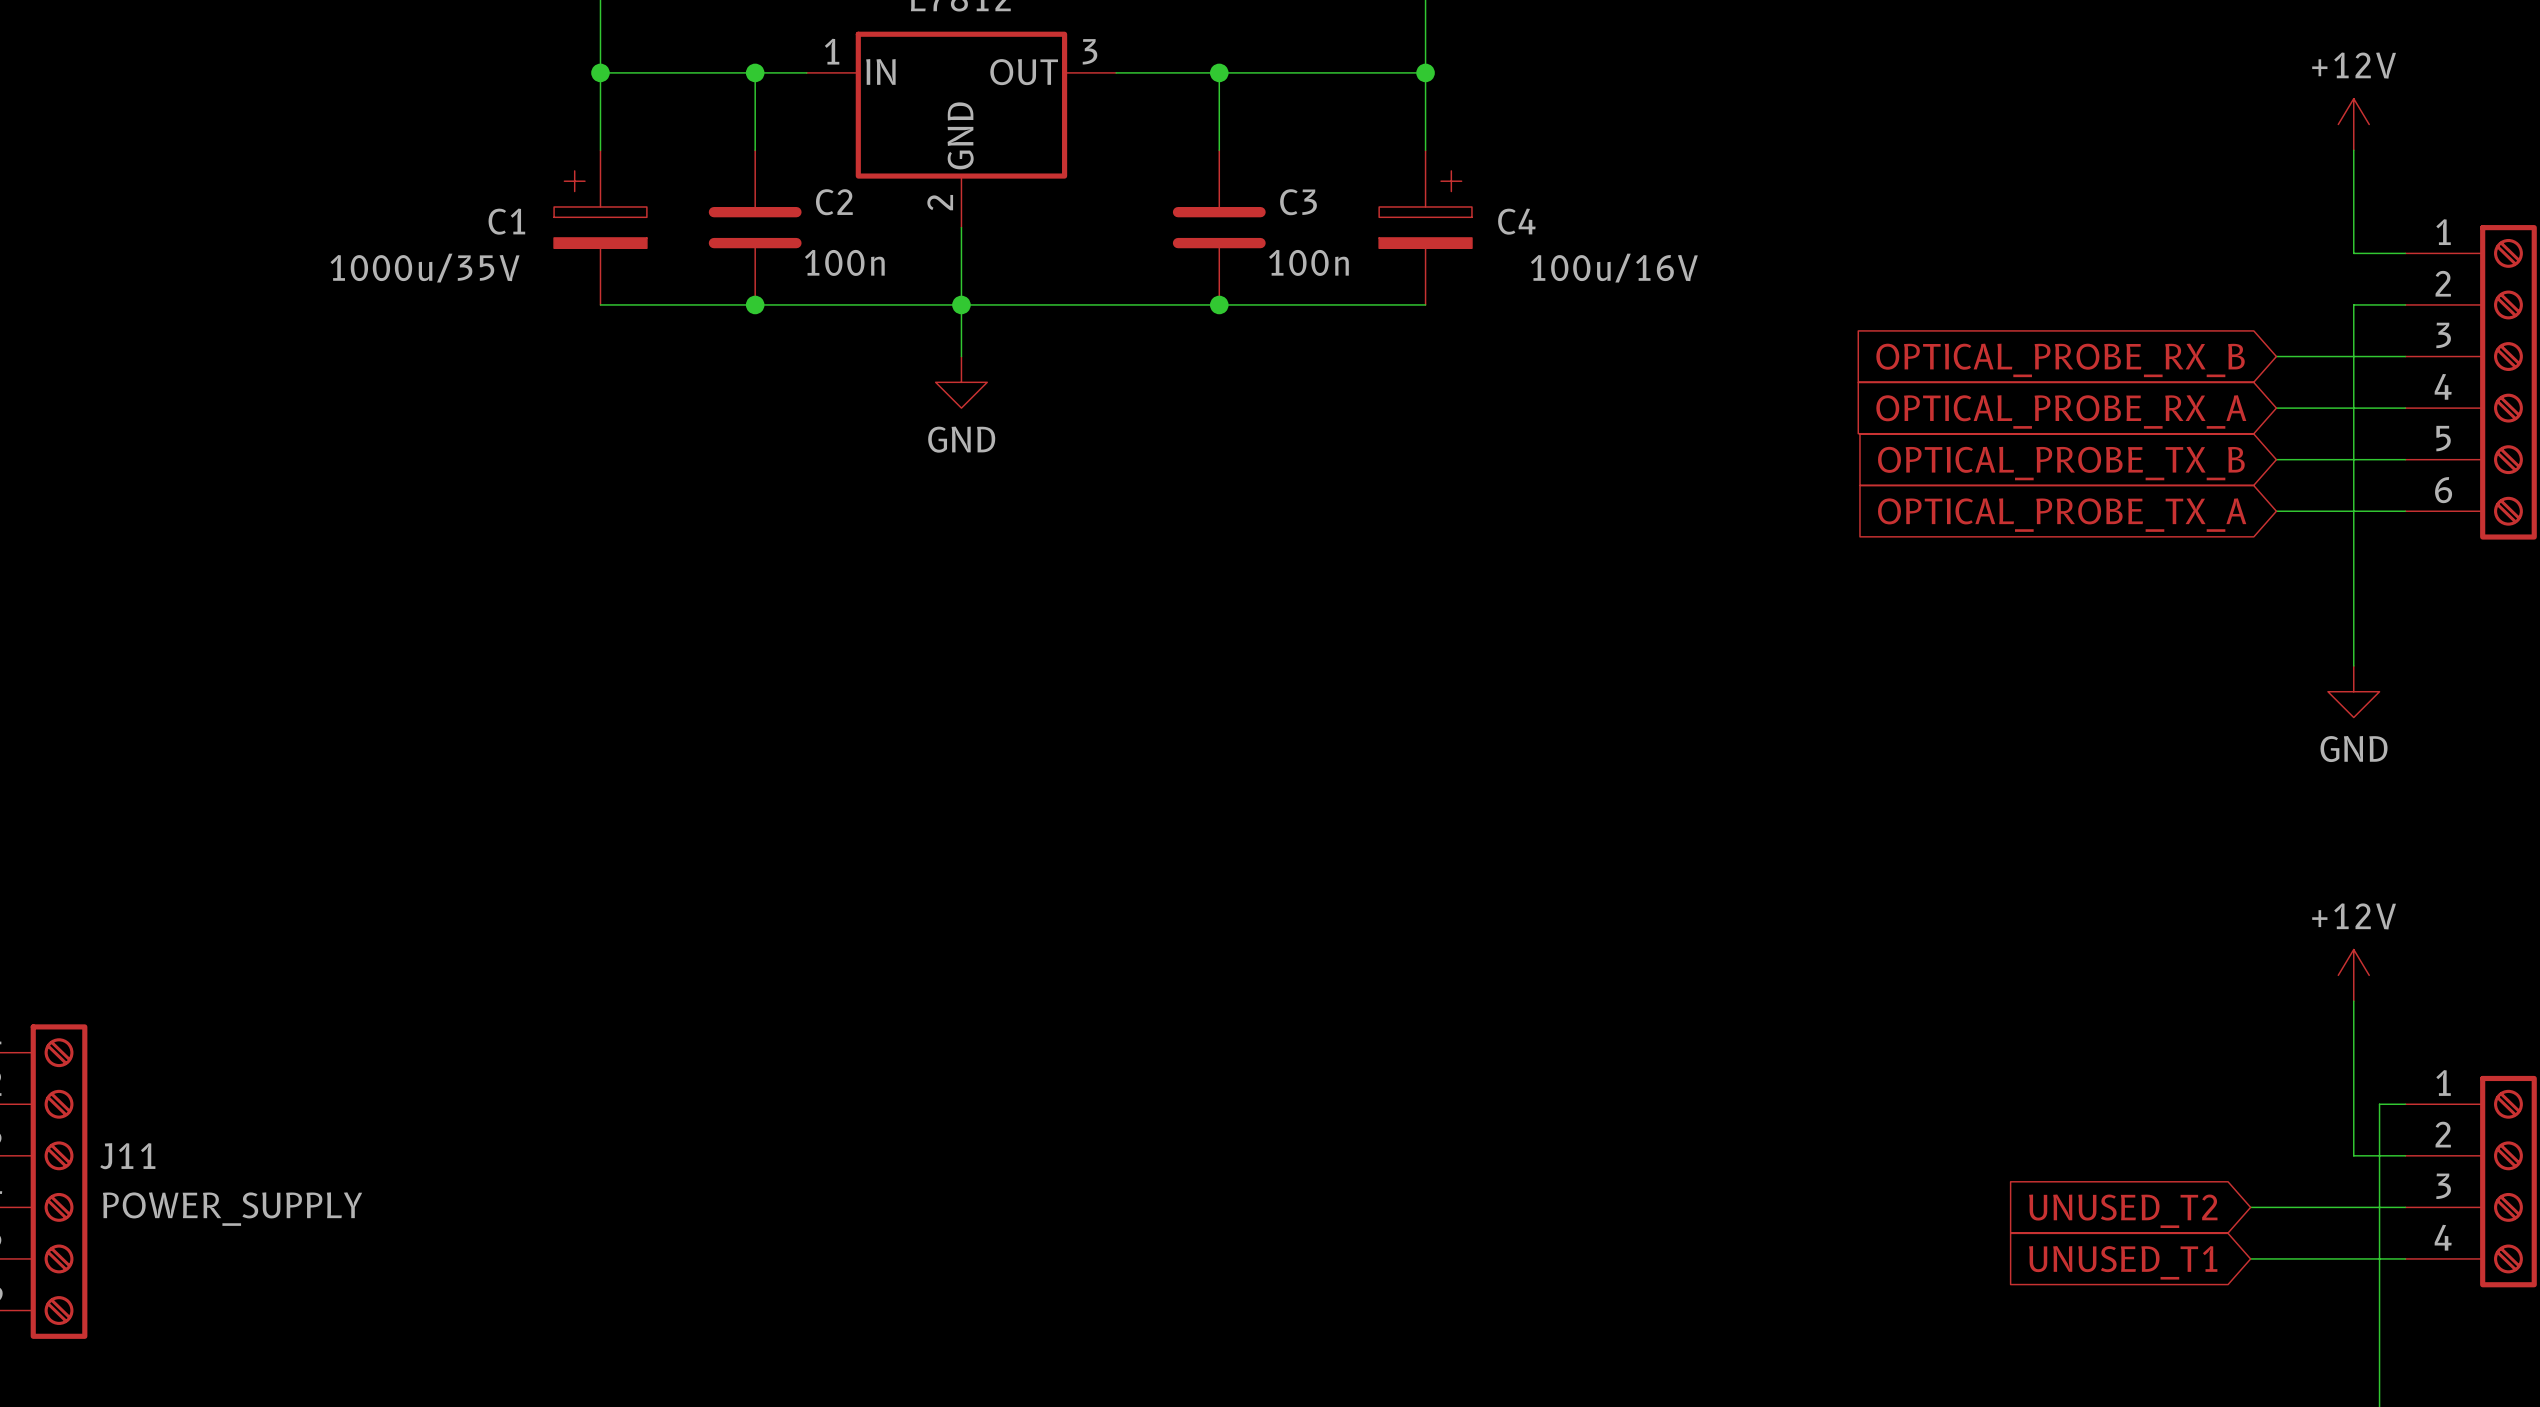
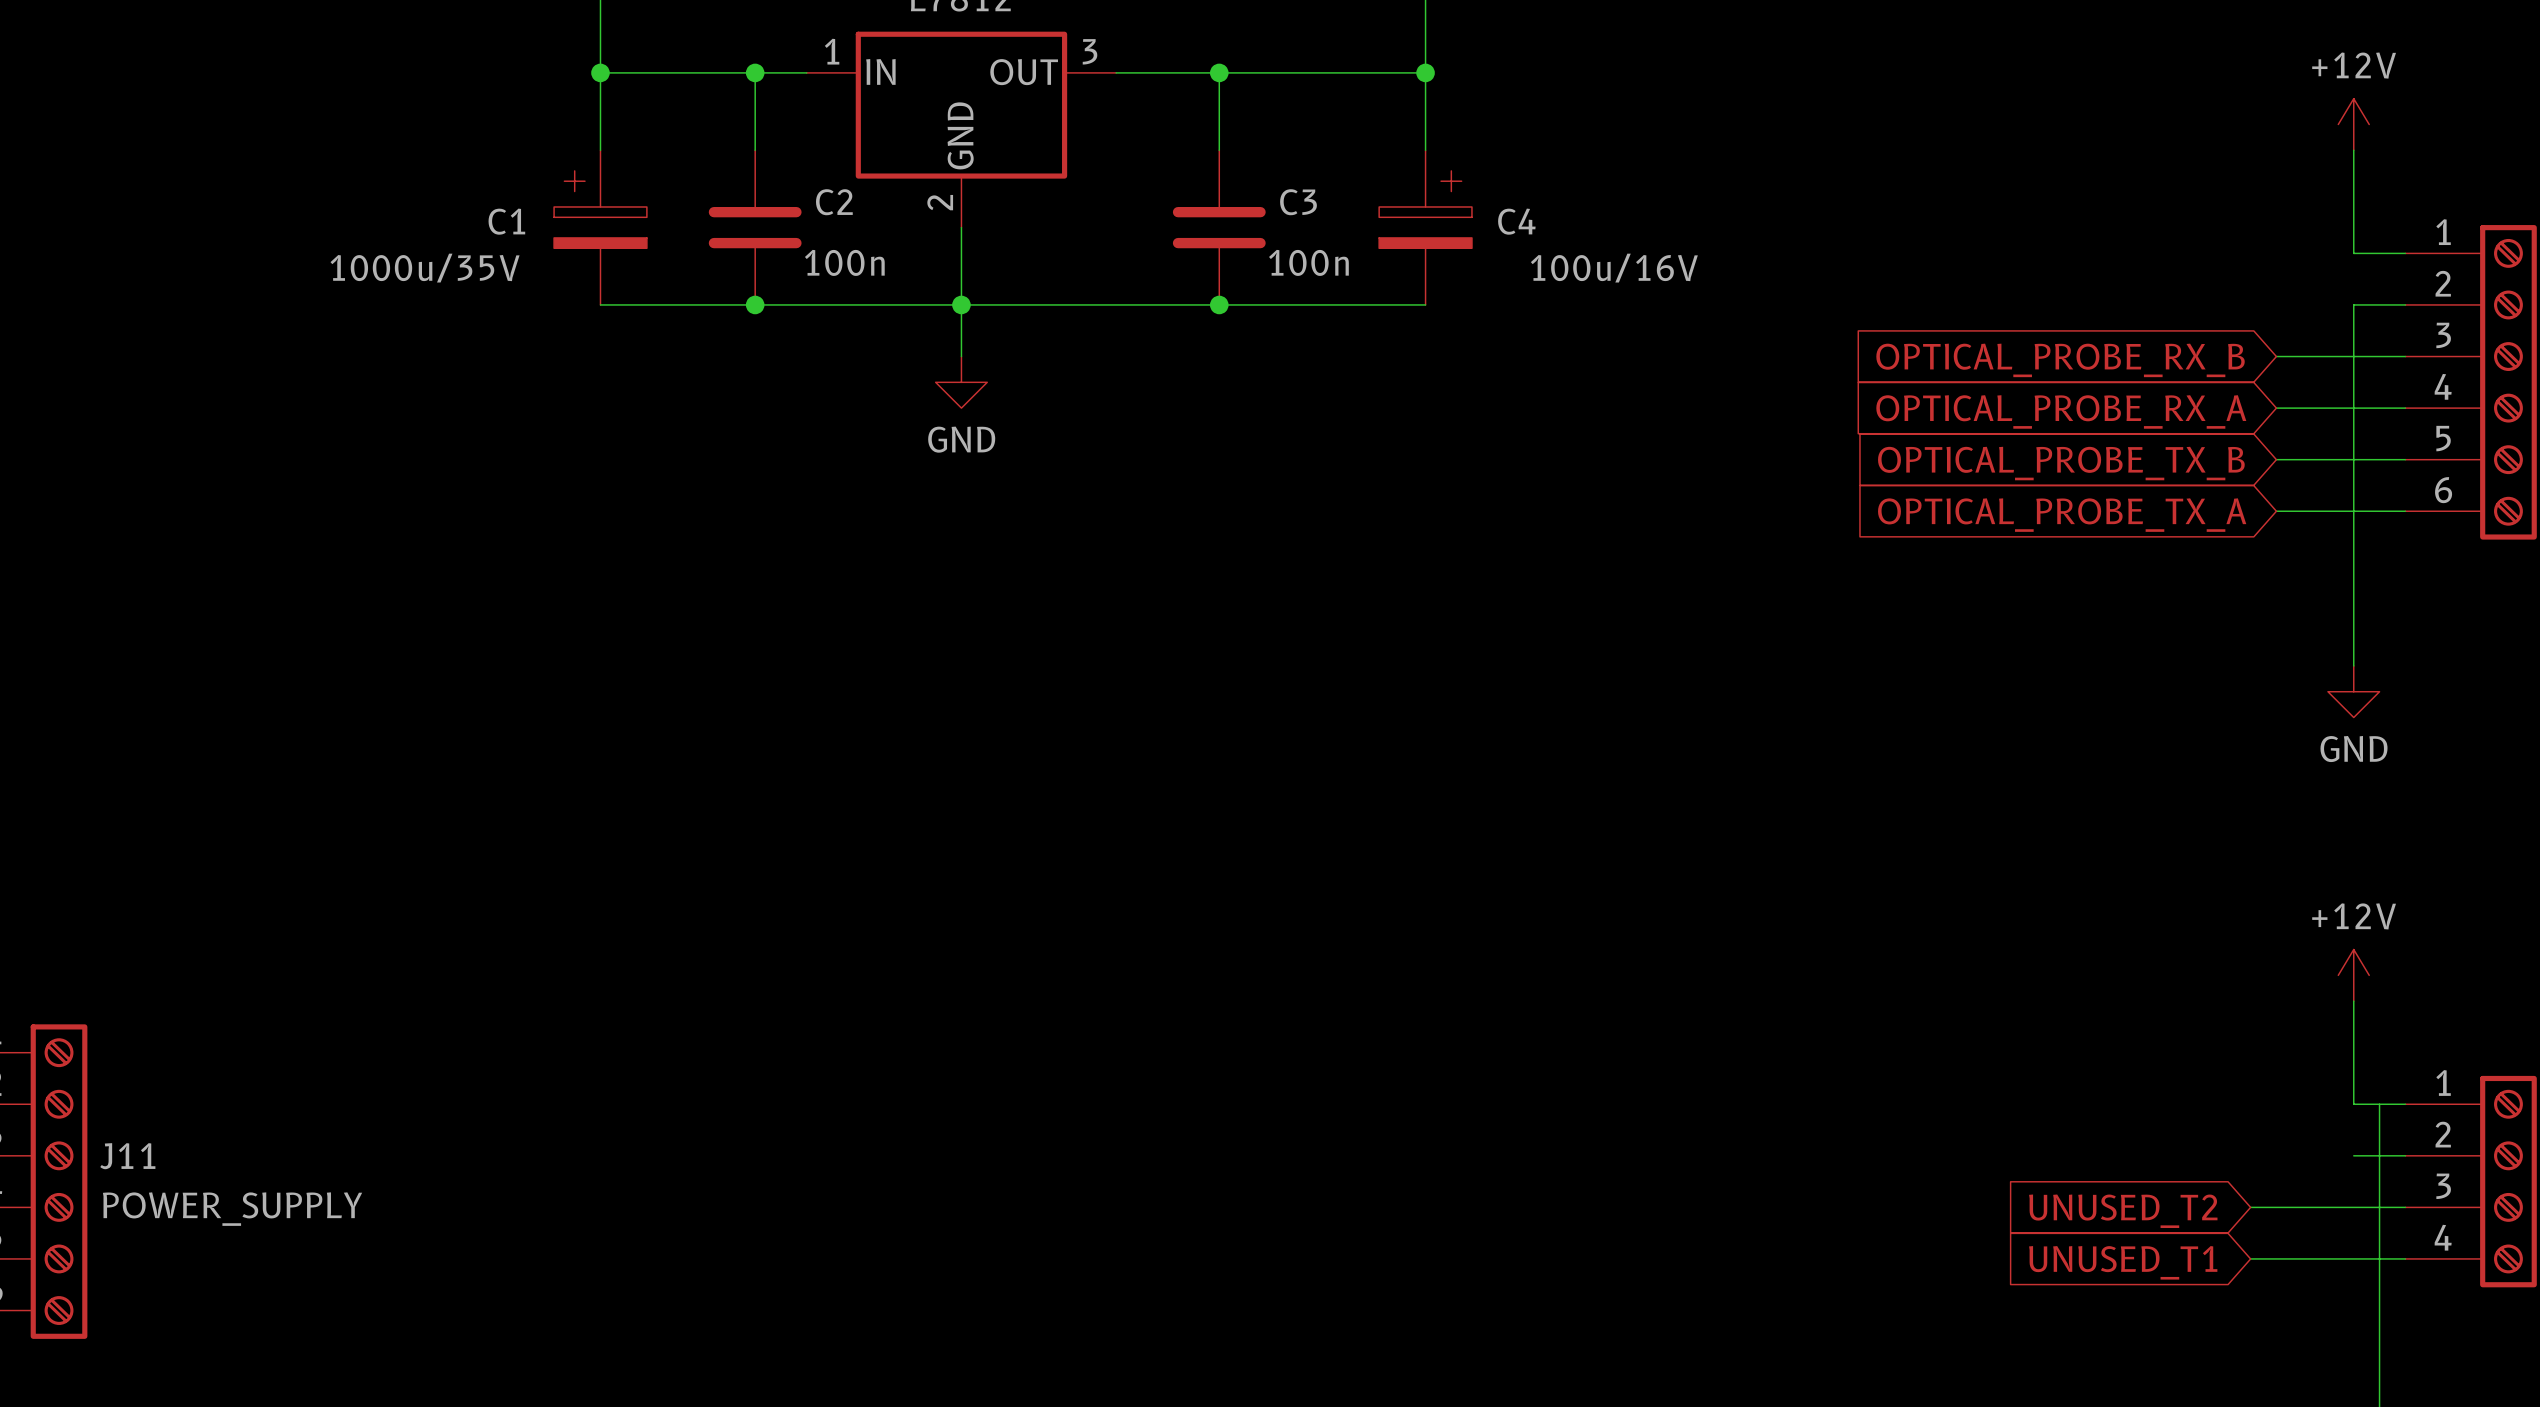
wire: (2353, 1104) (2353, 1155) -> (2353, 1104) (2379, 1104)

